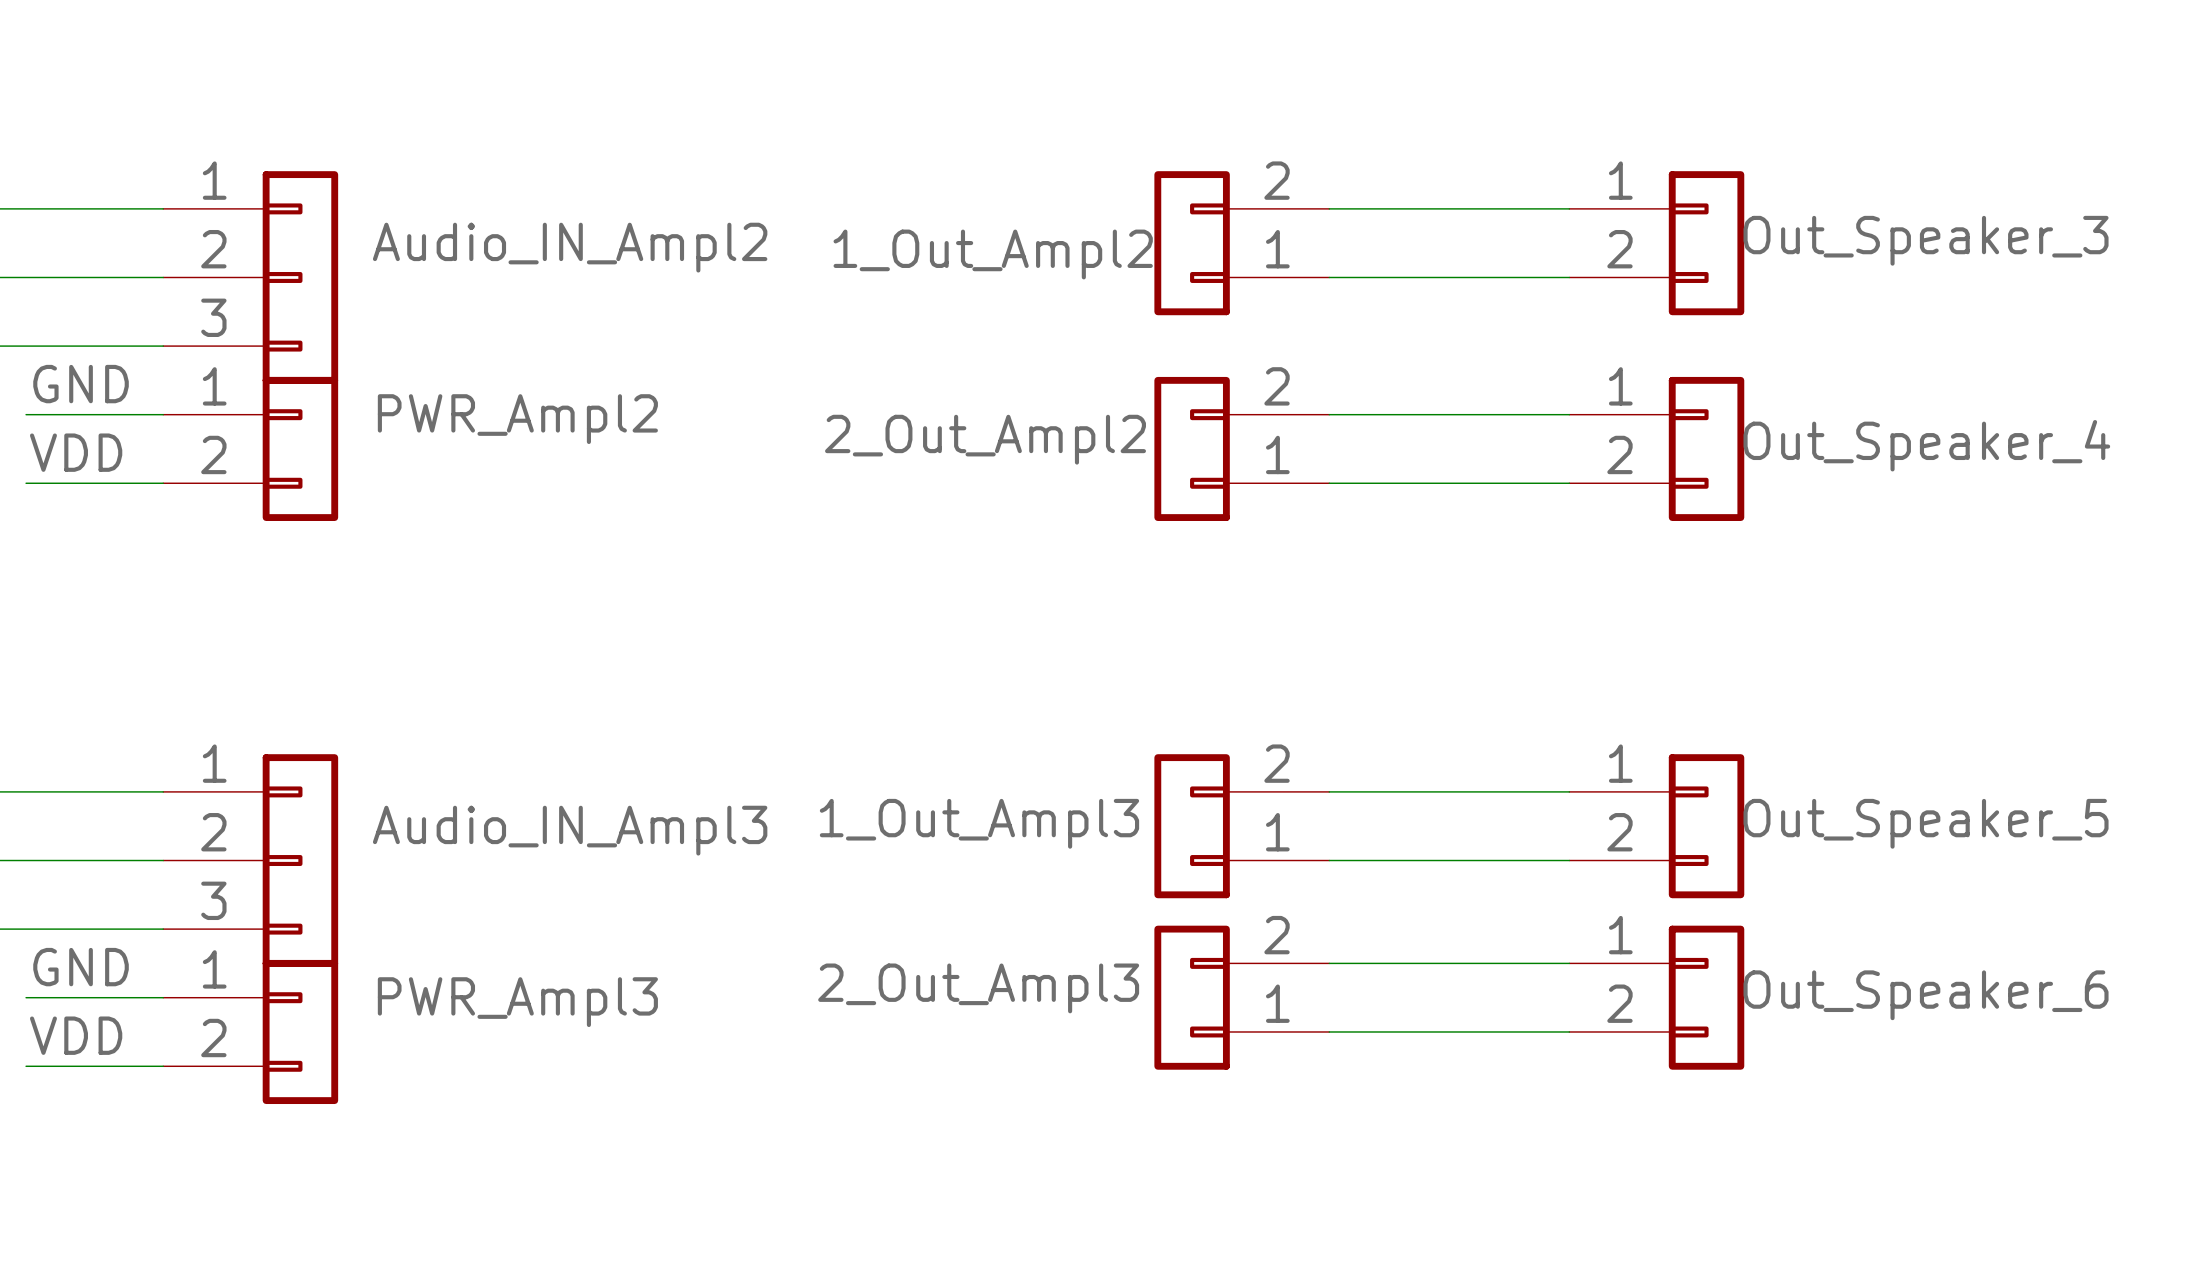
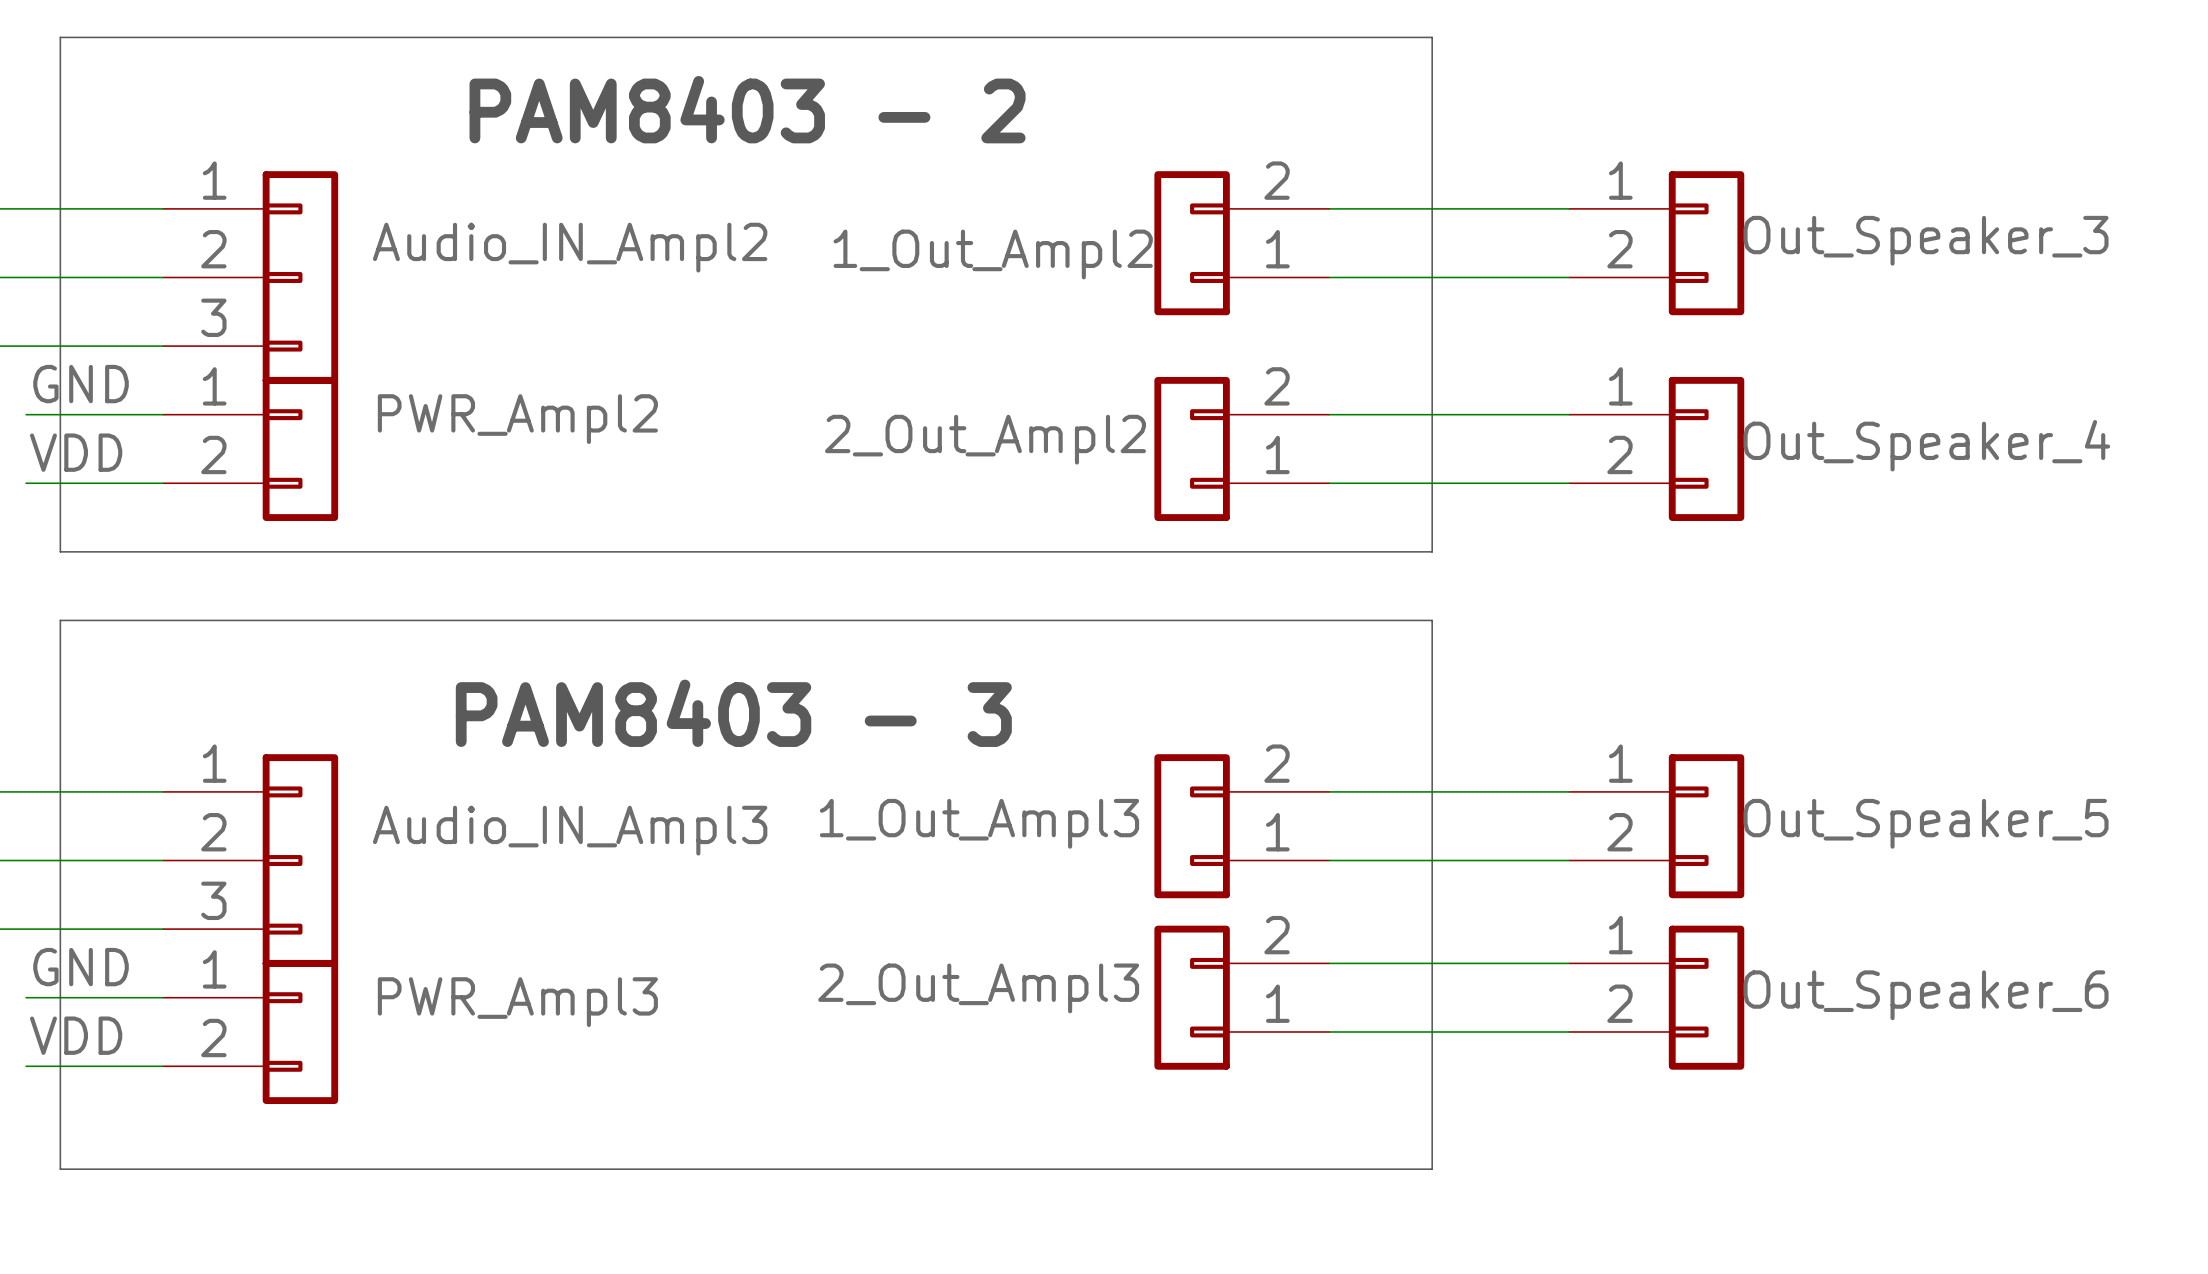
line: none -> (60, 37) (60, 551) (1432, 551) (1432, 37) (60, 37)
text: none -> PAM8403 - 2 (747, 109)
line: none -> (60, 620) (1432, 620) (1432, 1169) (60, 1169) (60, 620)
text: none -> PAM8403 - 3 (733, 713)

